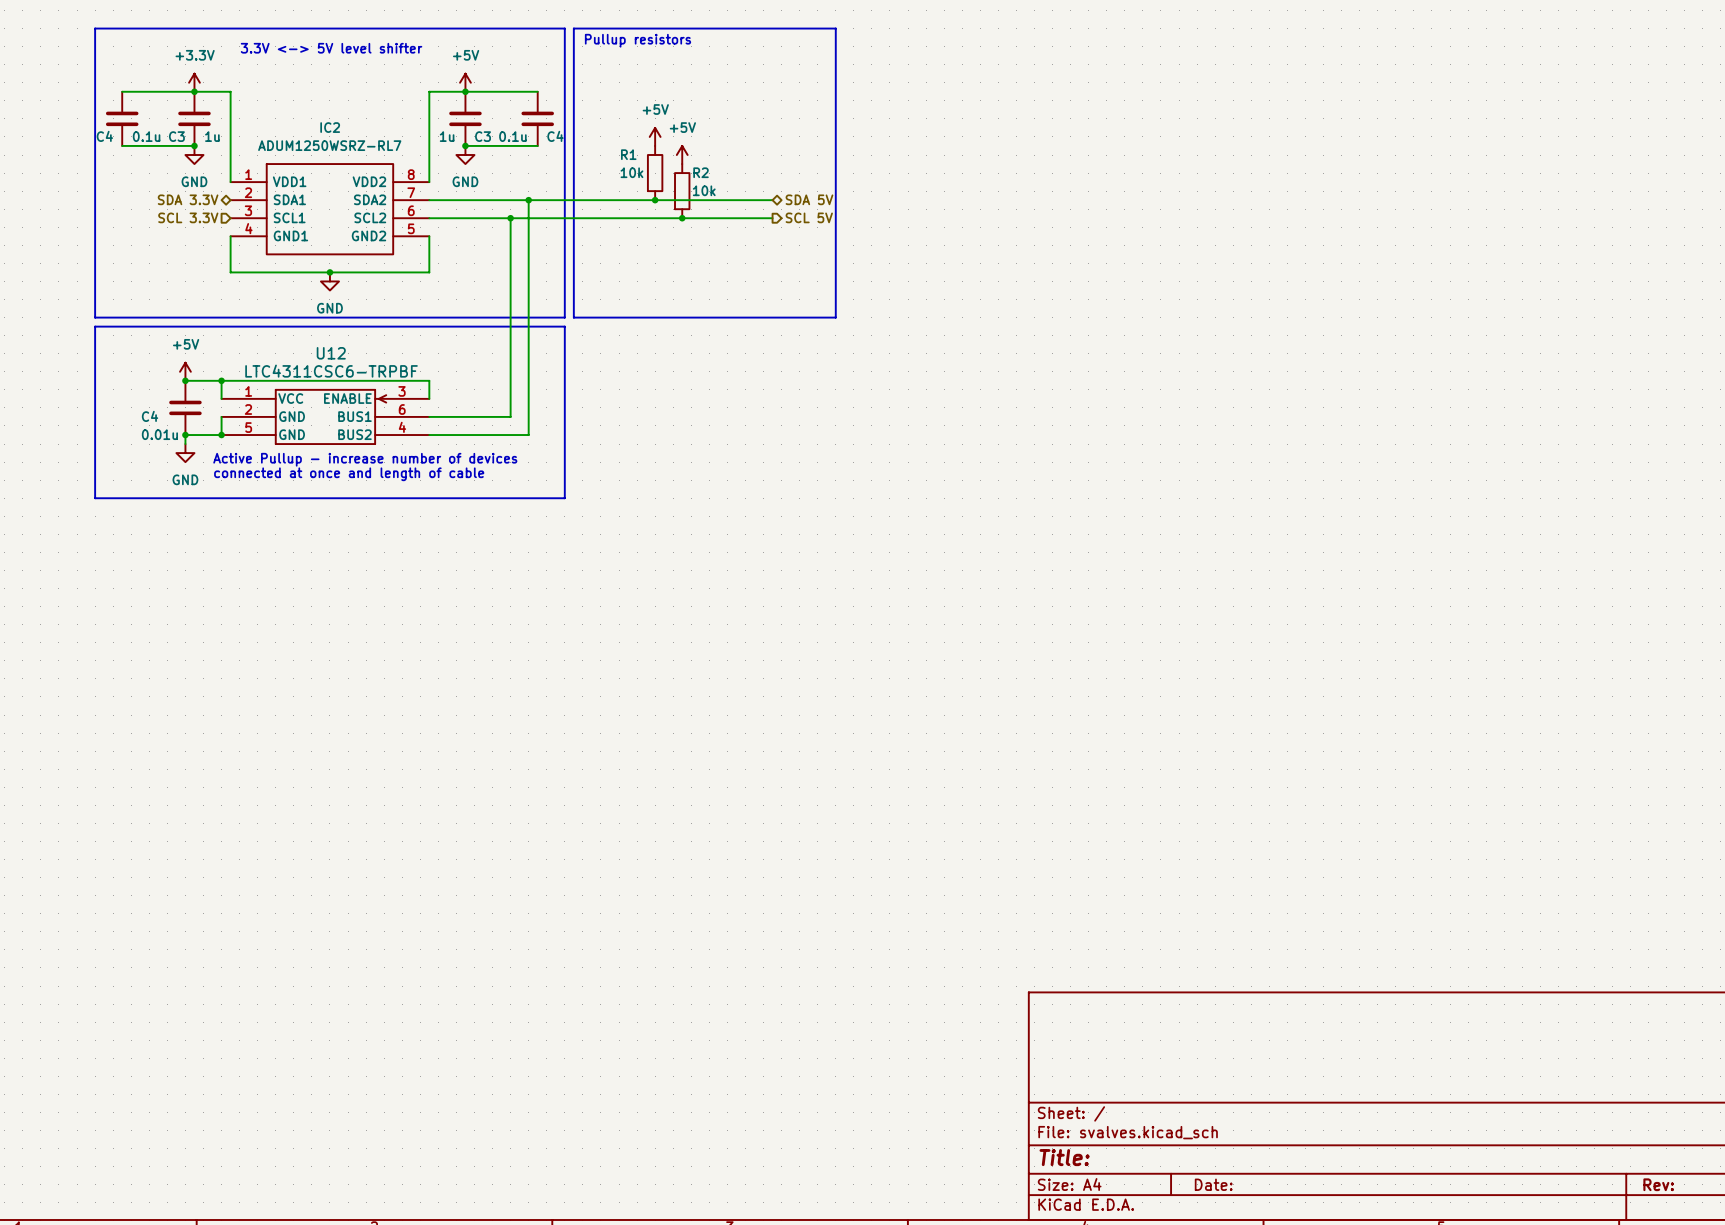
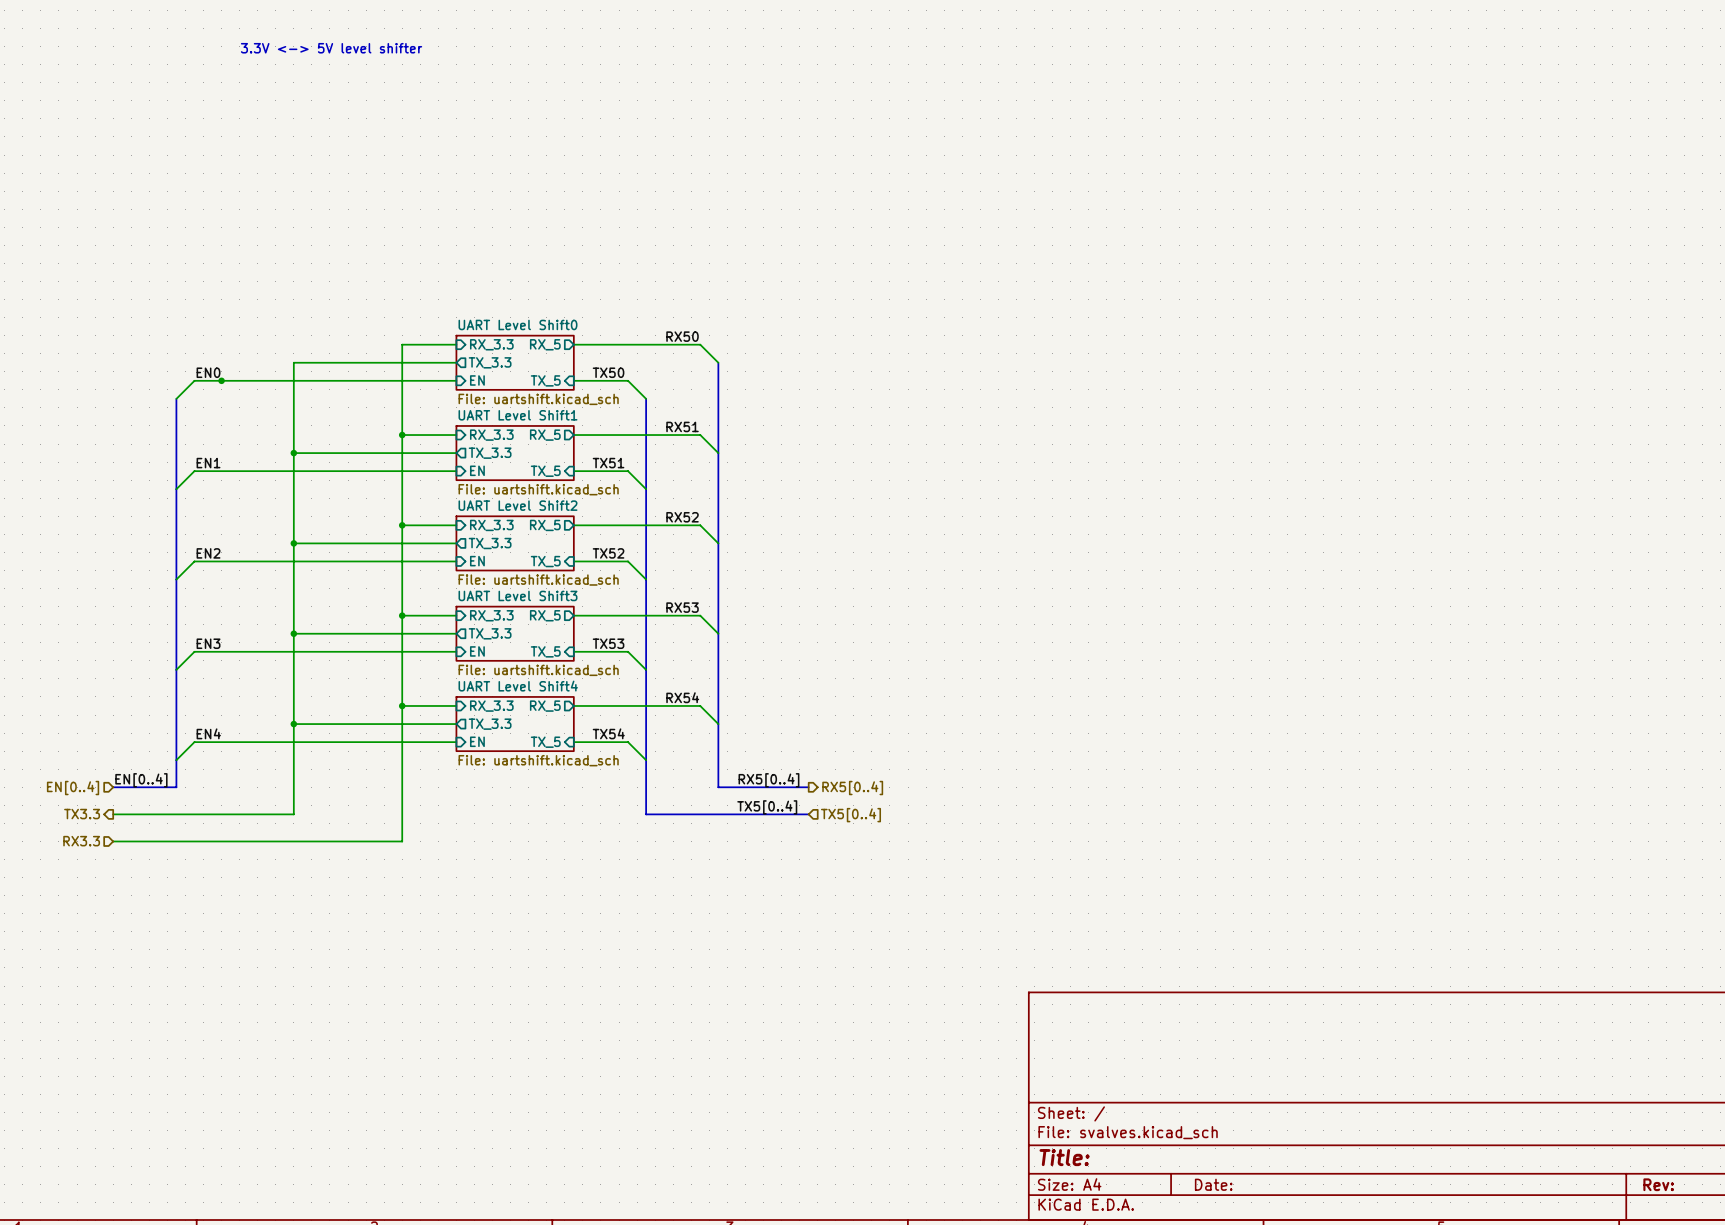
line: (95, 28) (95, 317) (564, 317) (564, 28) (95, 28) -> none
line: (573, 28) (835, 28) (835, 317) (573, 317) (573, 28) -> none
text: Pullup resistors (638, 40) -> none
power symbol: +3.3V (194, 82) -> none
power symbol: +5V (465, 82) -> none
wire: (122, 91) (230, 91) (230, 182) -> none
junction: (194, 91) -> none
junction: (465, 91) -> none
wire: (537, 91) (429, 91) (429, 182) -> none
C4: 0.1u (122, 118) -> none
C3: 1u (194, 118) -> none
C3: 1u (465, 118) -> none
C4: 0.1u (537, 118) -> none
power symbol: +5V (655, 136) -> none
wire: (122, 145) (194, 145) -> none
junction: (194, 145) -> none
wire: (465, 145) (537, 145) -> none
junction: (465, 145) -> none
power symbol: GND (194, 155) -> none
power symbol: GND (465, 155) -> none
power symbol: +5V (682, 155) -> none
R1: 10k (655, 173) -> none
R2: 10k (682, 191) -> none
hierarchical label: SDA 3.3V (188, 199) -> none
hierarchical label: SDA 5V (809, 199) -> none
wire: (429, 200) (772, 200) -> none
wire: (528, 200) (528, 435) (456, 435) -> none
junction: (528, 200) -> none
junction: (655, 200) -> none
IC2: ADUM1250WSRZ-RL7 (329, 209) -> none
hierarchical label: SCL 3.3V (188, 217) -> none
hierarchical label: SCL 5V (809, 217) -> none
wire: (429, 218) (772, 218) -> none
wire: (510, 218) (510, 416) (429, 416) -> none
junction: (510, 218) -> none
junction: (682, 218) -> none
wire: (230, 236) (230, 272) (429, 272) (429, 236) -> none
junction: (329, 272) -> none
power symbol: GND (329, 281) -> none
line: (95, 326) (564, 326) (564, 498) (95, 498) (95, 326) -> none
label: none -> RX50 (682, 336)
wire: none -> (456, 344) (402, 344) (402, 841) (113, 841)
sheet pin: none -> RX_3.3 (491, 344)
sheet pin: none -> RX_5 (545, 344)
wire: none -> (573, 344) (700, 344) (718, 362)
wire: none -> (456, 362) (293, 362) (293, 814) (113, 814)
sheet pin: none -> TX_3.3 (490, 362)
sheet UART Level Shift0: none -> File: uartshift.kicad_sch (515, 362)
bus: none -> (718, 362) (718, 787) (808, 787)
power symbol: +5V (185, 371) -> none
label: none -> EN0 (208, 372)
label: none -> TX50 (608, 372)
wire: (185, 380) (194, 380) -> (176, 398) (194, 380)
junction: (185, 380) -> none
wire: (221, 380) (221, 398) -> none
wire: (429, 380) (429, 398) -> (429, 380) (456, 380)
sheet pin: none -> EN (477, 380)
sheet pin: none -> TX_5 (545, 380)
wire: none -> (573, 380) (628, 380) (646, 398)
bus: none -> (176, 398) (176, 787) (113, 787)
bus: none -> (646, 398) (646, 814) (808, 814)
C4: 0.01u (185, 407) -> none
wire: (221, 416) (221, 435) (185, 435) (185, 444) -> none
U12: LTC4311CSC6-TRPBF (325, 416) -> none
label: none -> RX51 (682, 426)
junction: (185, 435) -> none
junction: (221, 435) -> none
junction: none -> (402, 435)
sheet pin: none -> RX_3.3 (491, 435)
sheet pin: none -> RX_5 (545, 435)
wire: none -> (573, 435) (700, 435) (718, 453)
power symbol: GND (185, 453) -> none
wire: none -> (293, 453) (456, 453)
junction: none -> (293, 453)
sheet pin: none -> TX_3.3 (490, 453)
sheet UART Level Shift1: none -> File: uartshift.kicad_sch (515, 453)
text: Active Pullup - increase number of devices (365, 459) -> none
label: none -> EN1 (208, 463)
label: none -> TX51 (608, 463)
sheet pin: none -> EN (477, 470)
wire: none -> (456, 471) (194, 471) (176, 489)
sheet pin: none -> TX_5 (545, 471)
wire: none -> (573, 471) (628, 471) (646, 489)
text: connected at once and length of cable (349, 474) -> none
label: none -> RX52 (682, 517)
wire: none -> (402, 525) (456, 525)
junction: none -> (402, 525)
sheet pin: none -> RX_3.3 (491, 525)
sheet pin: none -> RX_5 (545, 525)
wire: none -> (573, 525) (700, 525) (718, 543)
wire: none -> (293, 543) (456, 543)
junction: none -> (293, 543)
sheet pin: none -> TX_3.3 (490, 543)
sheet UART Level Shift2: none -> File: uartshift.kicad_sch (515, 543)
label: none -> EN2 (208, 553)
label: none -> TX52 (608, 553)
wire: none -> (456, 561) (194, 561) (176, 579)
sheet pin: none -> EN (477, 561)
sheet pin: none -> TX_5 (545, 561)
wire: none -> (573, 561) (628, 561) (646, 579)
label: none -> RX53 (682, 607)
wire: none -> (402, 615) (456, 615)
junction: none -> (402, 615)
sheet pin: none -> RX_3.3 (491, 615)
sheet pin: none -> RX_5 (545, 615)
wire: none -> (573, 615) (700, 615) (718, 633)
wire: none -> (293, 633) (456, 633)
junction: none -> (293, 633)
sheet pin: none -> TX_3.3 (490, 633)
sheet UART Level Shift3: none -> File: uartshift.kicad_sch (515, 633)
label: none -> EN3 (208, 643)
label: none -> TX53 (608, 643)
wire: none -> (456, 651) (194, 651) (176, 669)
sheet pin: none -> EN (477, 651)
sheet pin: none -> TX_5 (545, 651)
wire: none -> (573, 651) (628, 651) (646, 669)
label: none -> RX54 (682, 697)
wire: none -> (402, 705) (456, 705)
junction: none -> (402, 705)
wire: none -> (573, 705) (700, 705) (718, 724)
sheet pin: none -> RX_3.3 (491, 706)
sheet pin: none -> RX_5 (545, 706)
wire: none -> (293, 724) (456, 724)
junction: none -> (293, 724)
sheet pin: none -> TX_3.3 (490, 724)
sheet UART Level Shift4: none -> File: uartshift.kicad_sch (515, 724)
label: none -> EN4 (208, 733)
label: none -> TX54 (608, 733)
sheet pin: none -> EN (477, 741)
wire: none -> (456, 742) (194, 742) (176, 760)
sheet pin: none -> TX_5 (545, 742)
wire: none -> (573, 742) (628, 742) (646, 760)
label: none -> EN[0..4] (141, 780)
label: none -> RX5[0..4] (768, 780)
hierarchical label: none -> EN[0..4] (73, 788)
hierarchical label: none -> RX5[0..4] (852, 788)
label: none -> TX5[0..4] (767, 807)
hierarchical label: none -> TX3.3 (82, 814)
hierarchical label: none -> TX5[0..4] (850, 815)
hierarchical label: none -> RX3.3 (81, 841)

